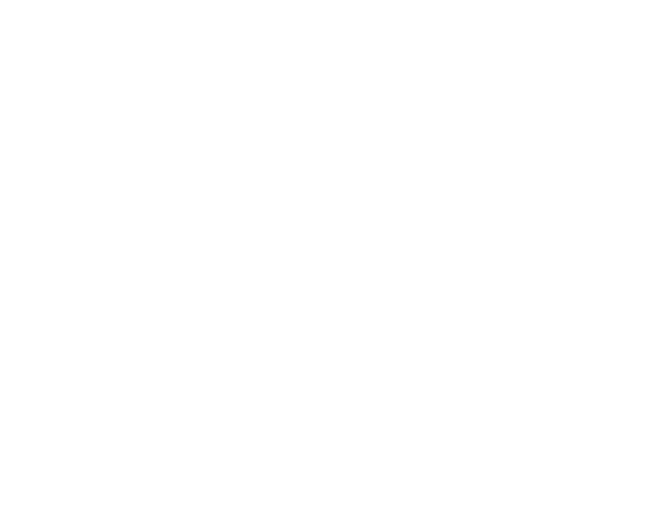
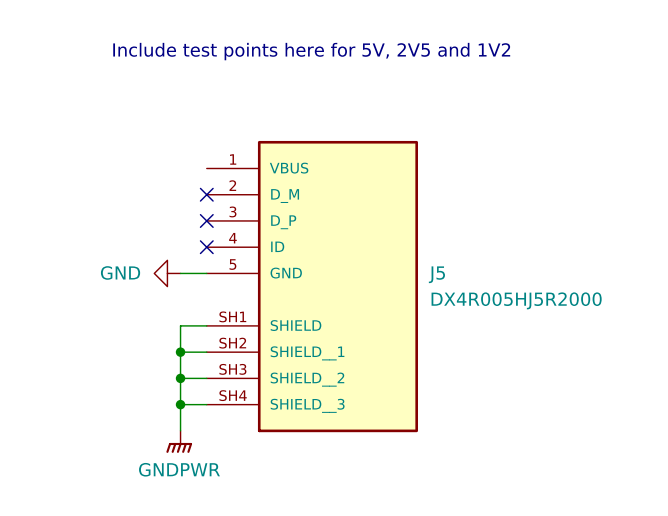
text: none -> Include test points here for 5V, 2V5 and 1V2 (311, 51)
no-connect mark: none -> (206, 194)
no-connect mark: none -> (206, 220)
no-connect mark: none -> (206, 247)
power symbol: none -> GND (167, 273)
wire: none -> (180, 273) (206, 273)
J5: none -> DX4R005HJ5R2000 (312, 286)
wire: none -> (206, 325) (180, 325) (180, 430)
wire: none -> (180, 352) (206, 352)
junction: none -> (180, 352)
wire: none -> (180, 378) (206, 378)
junction: none -> (180, 378)
wire: none -> (180, 404) (206, 404)
junction: none -> (180, 404)
power symbol: none -> GNDPWR (179, 441)

